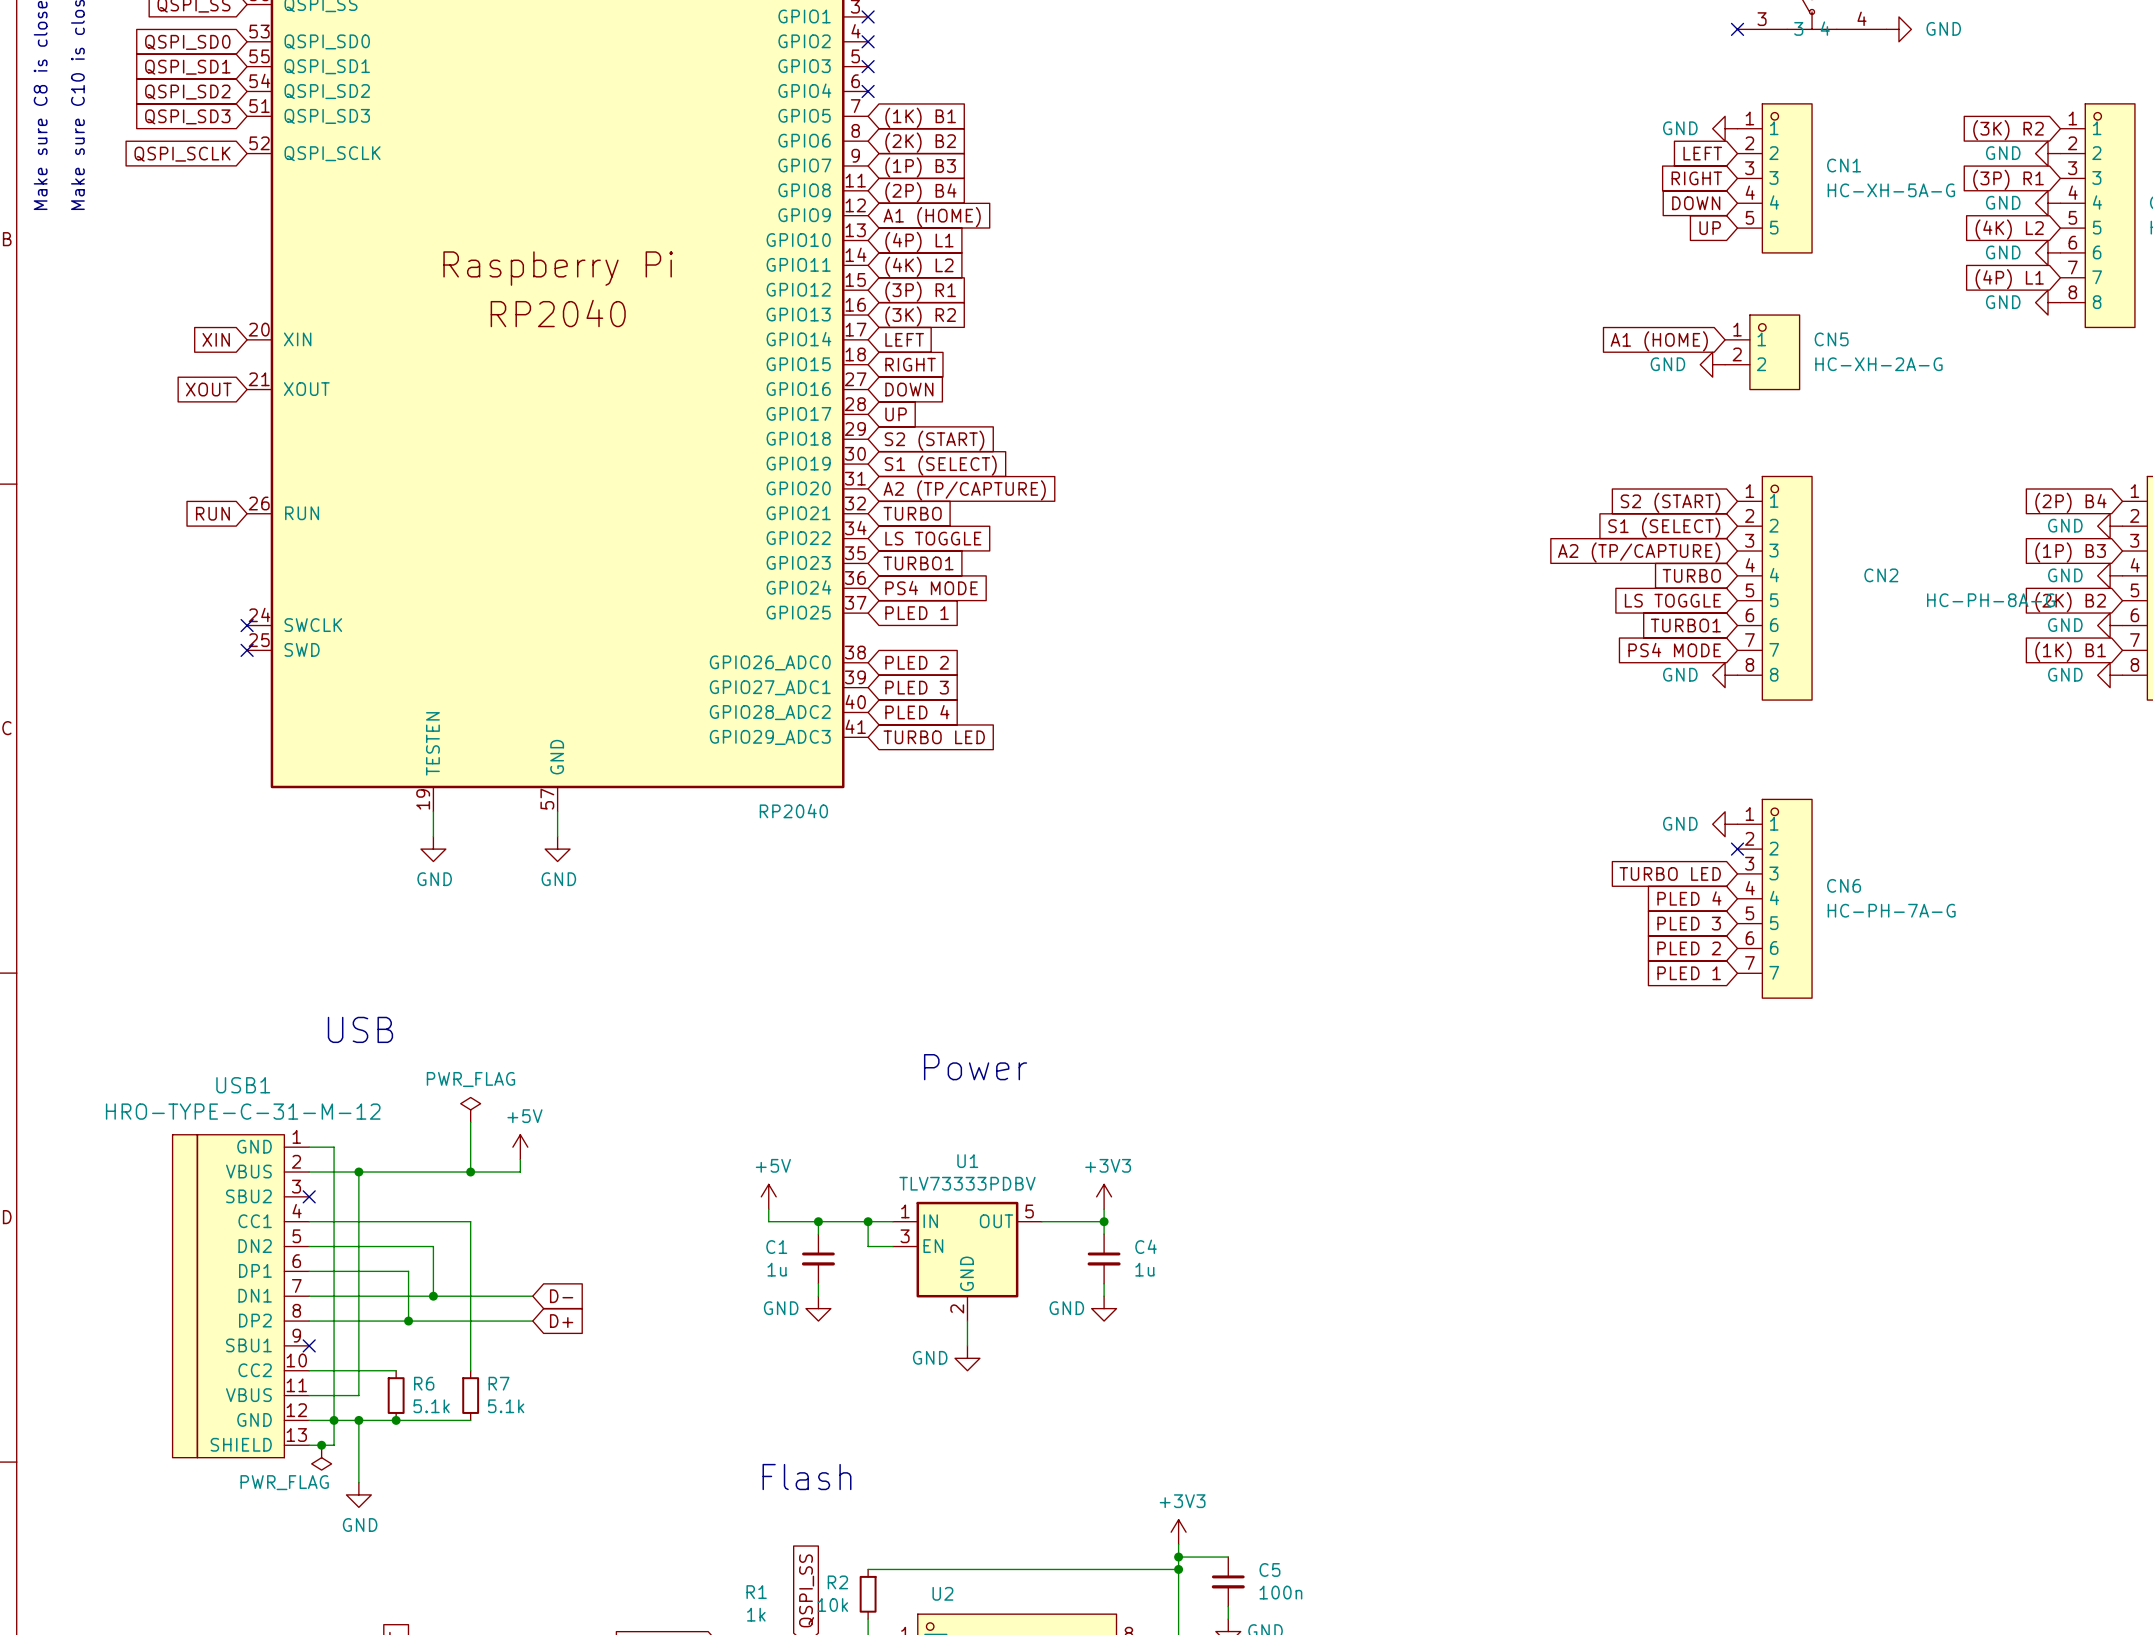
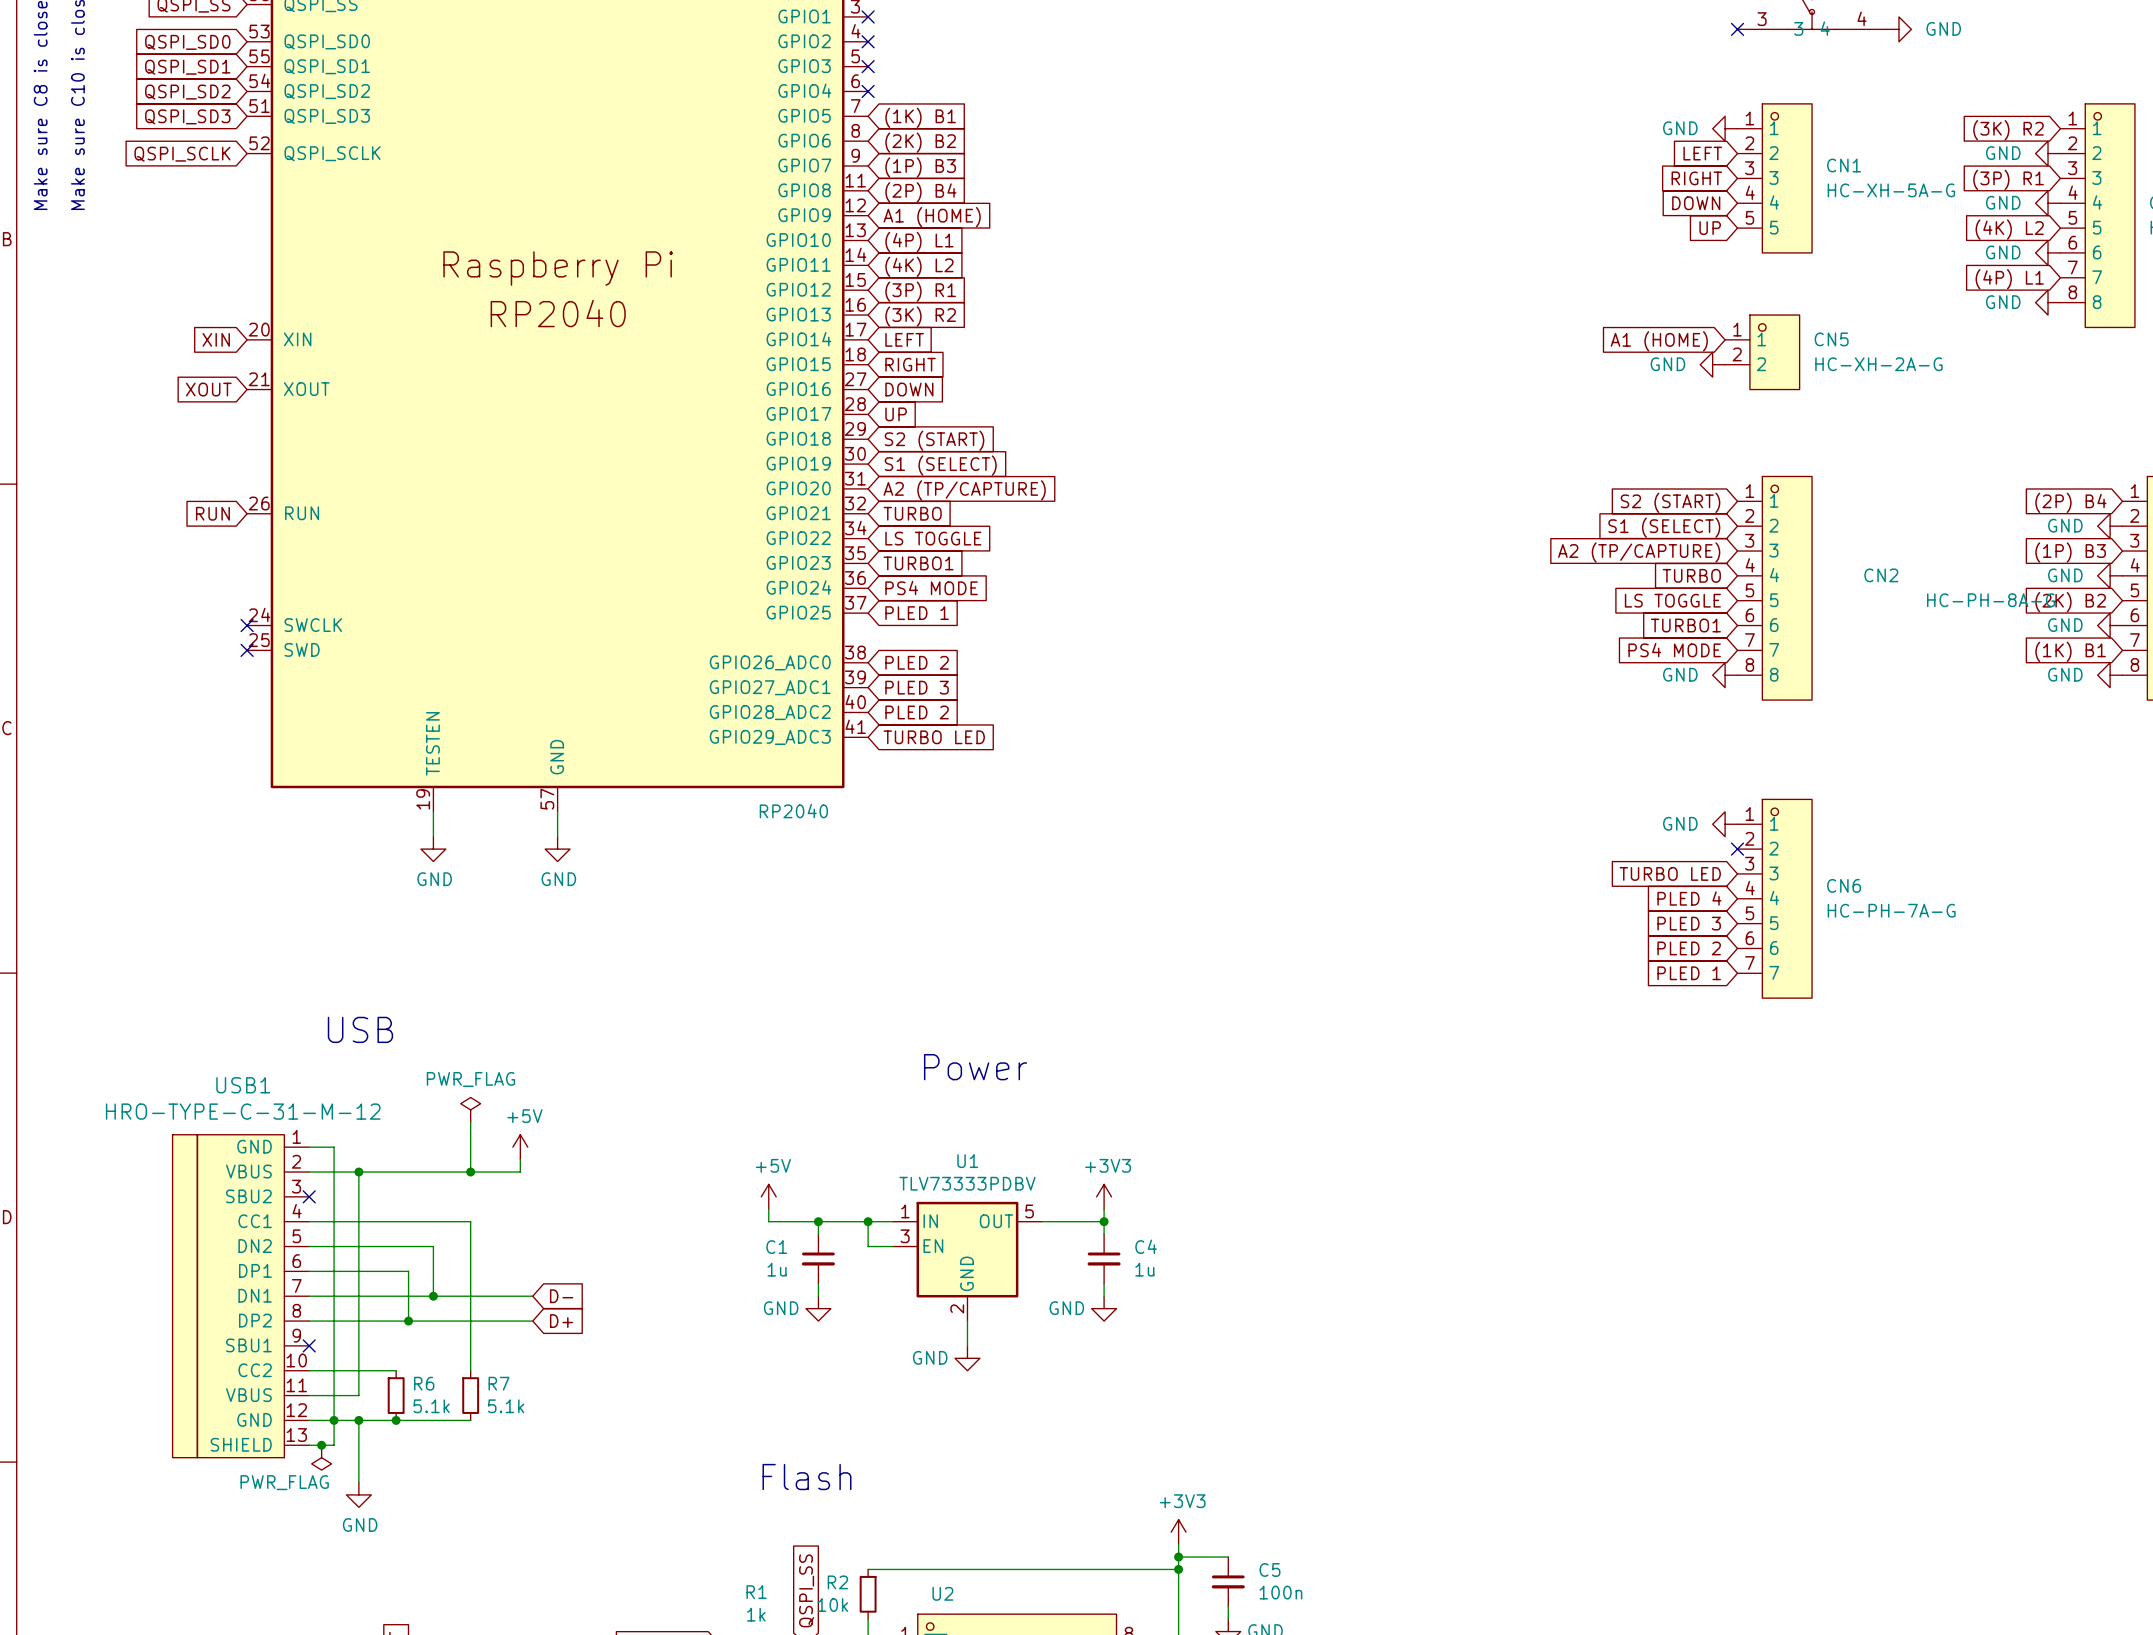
global label: PLED 4 (917, 712) -> PLED 2 (917, 712)

